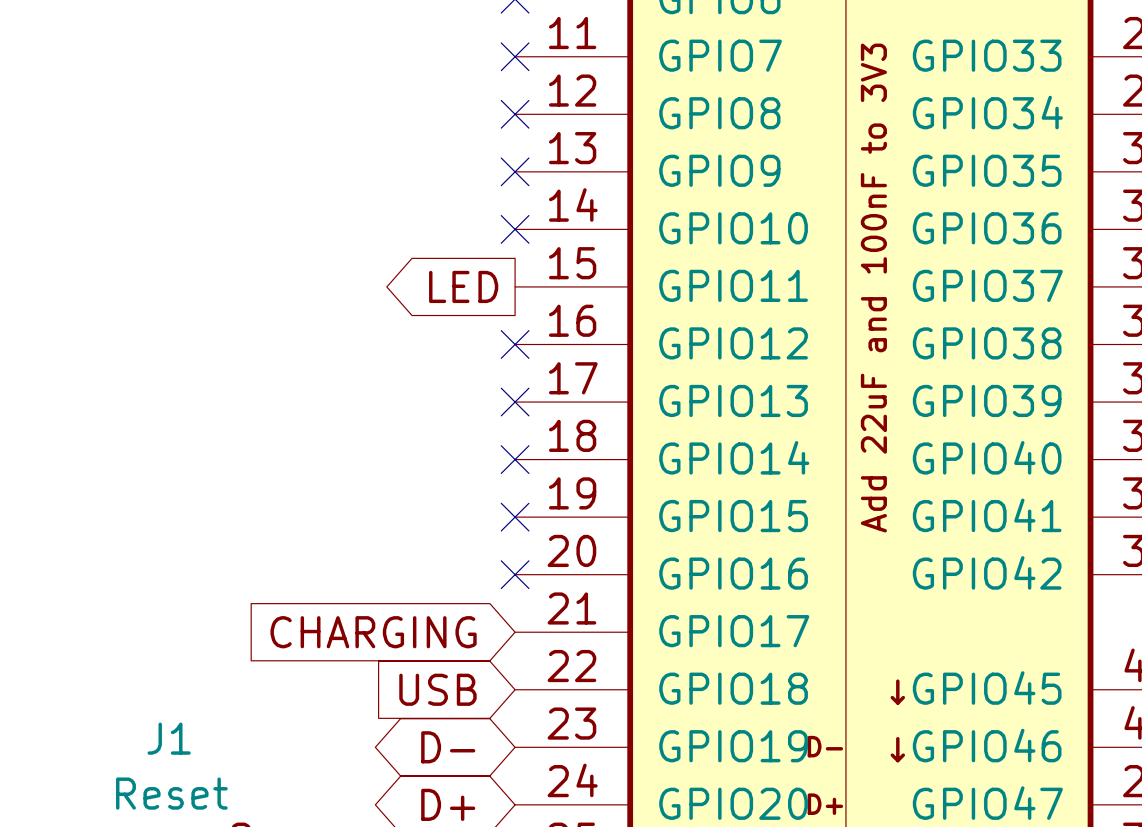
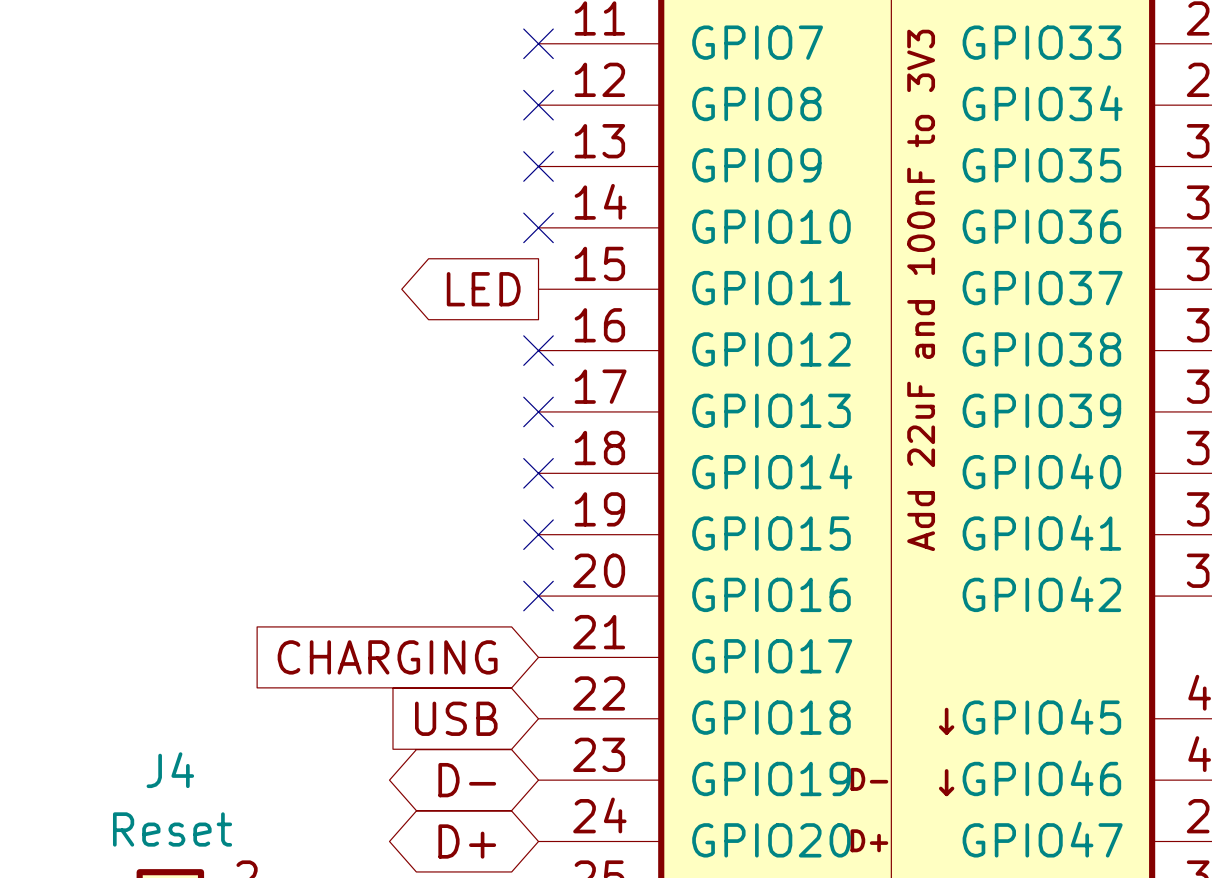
J1 name: J1 (169, 738) -> J4 (170, 770)

